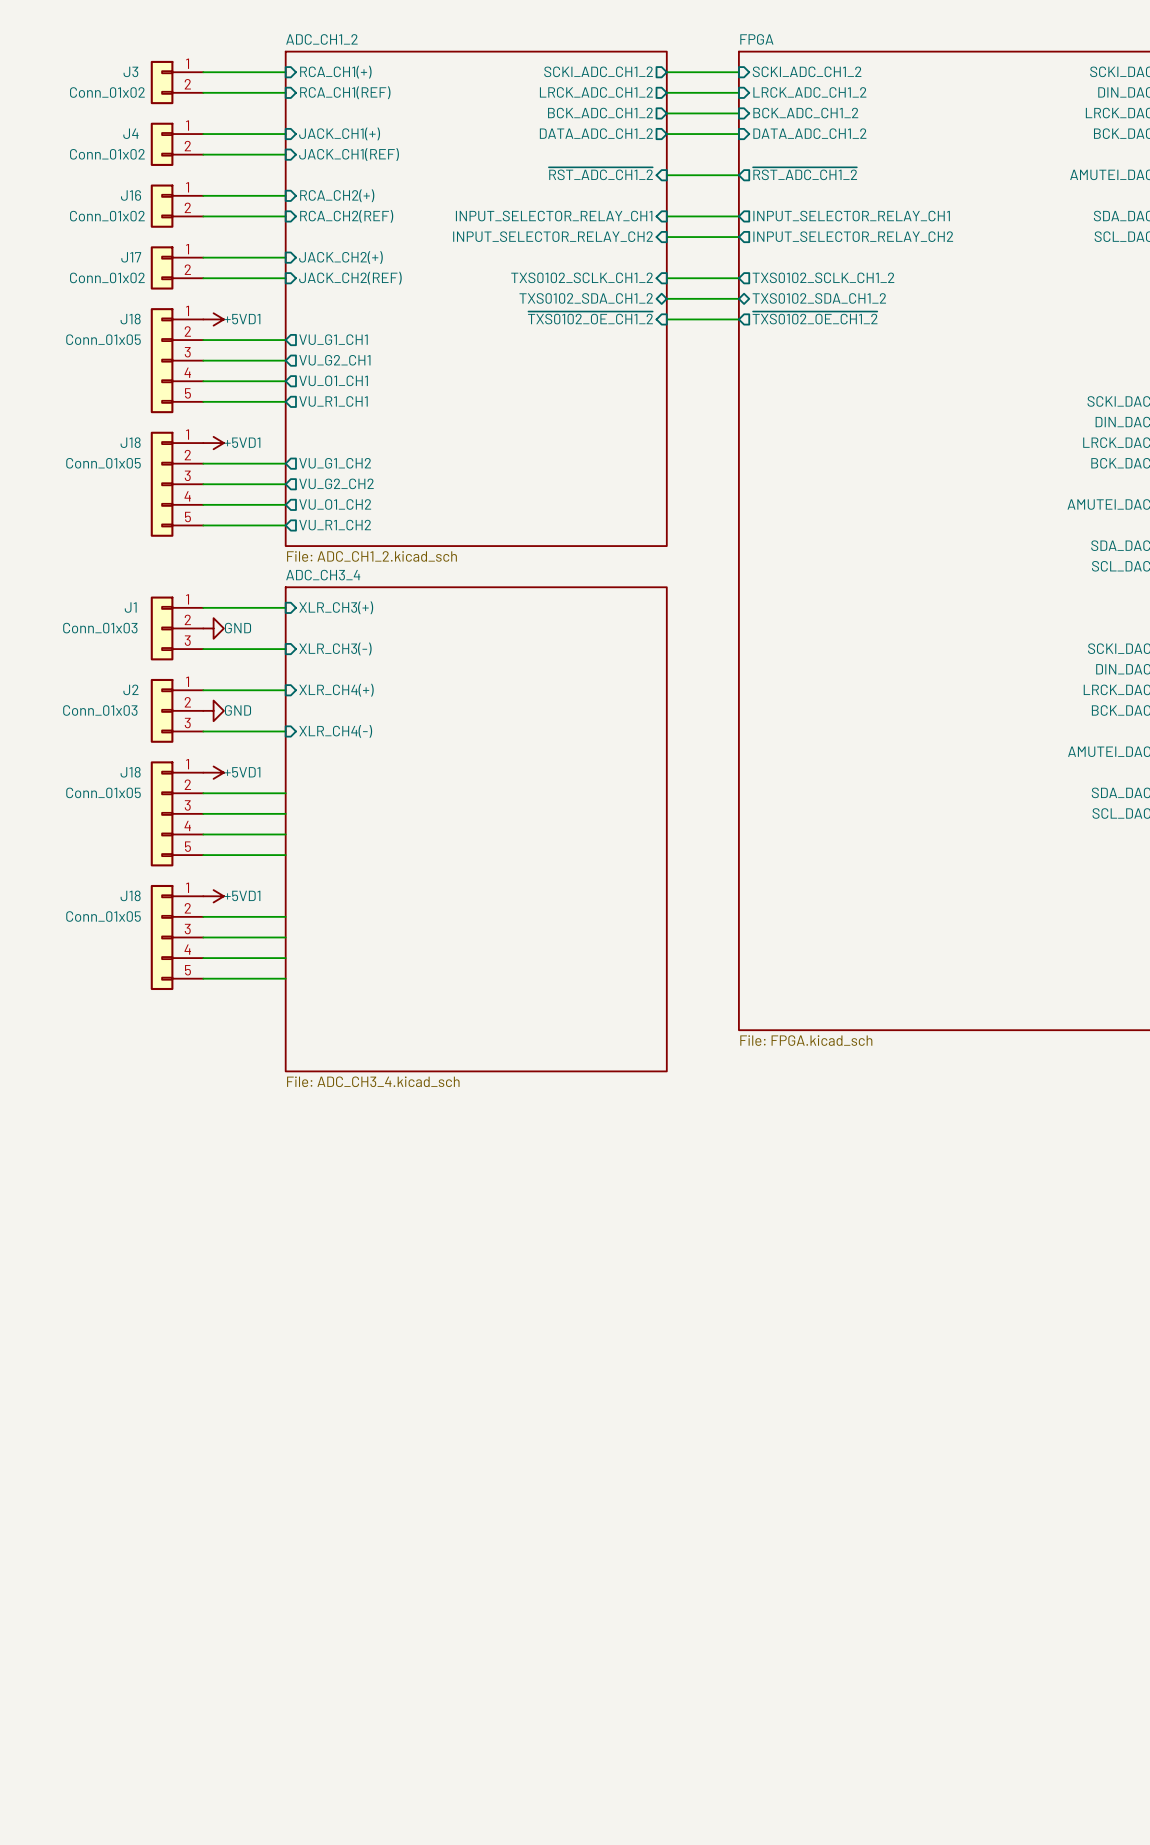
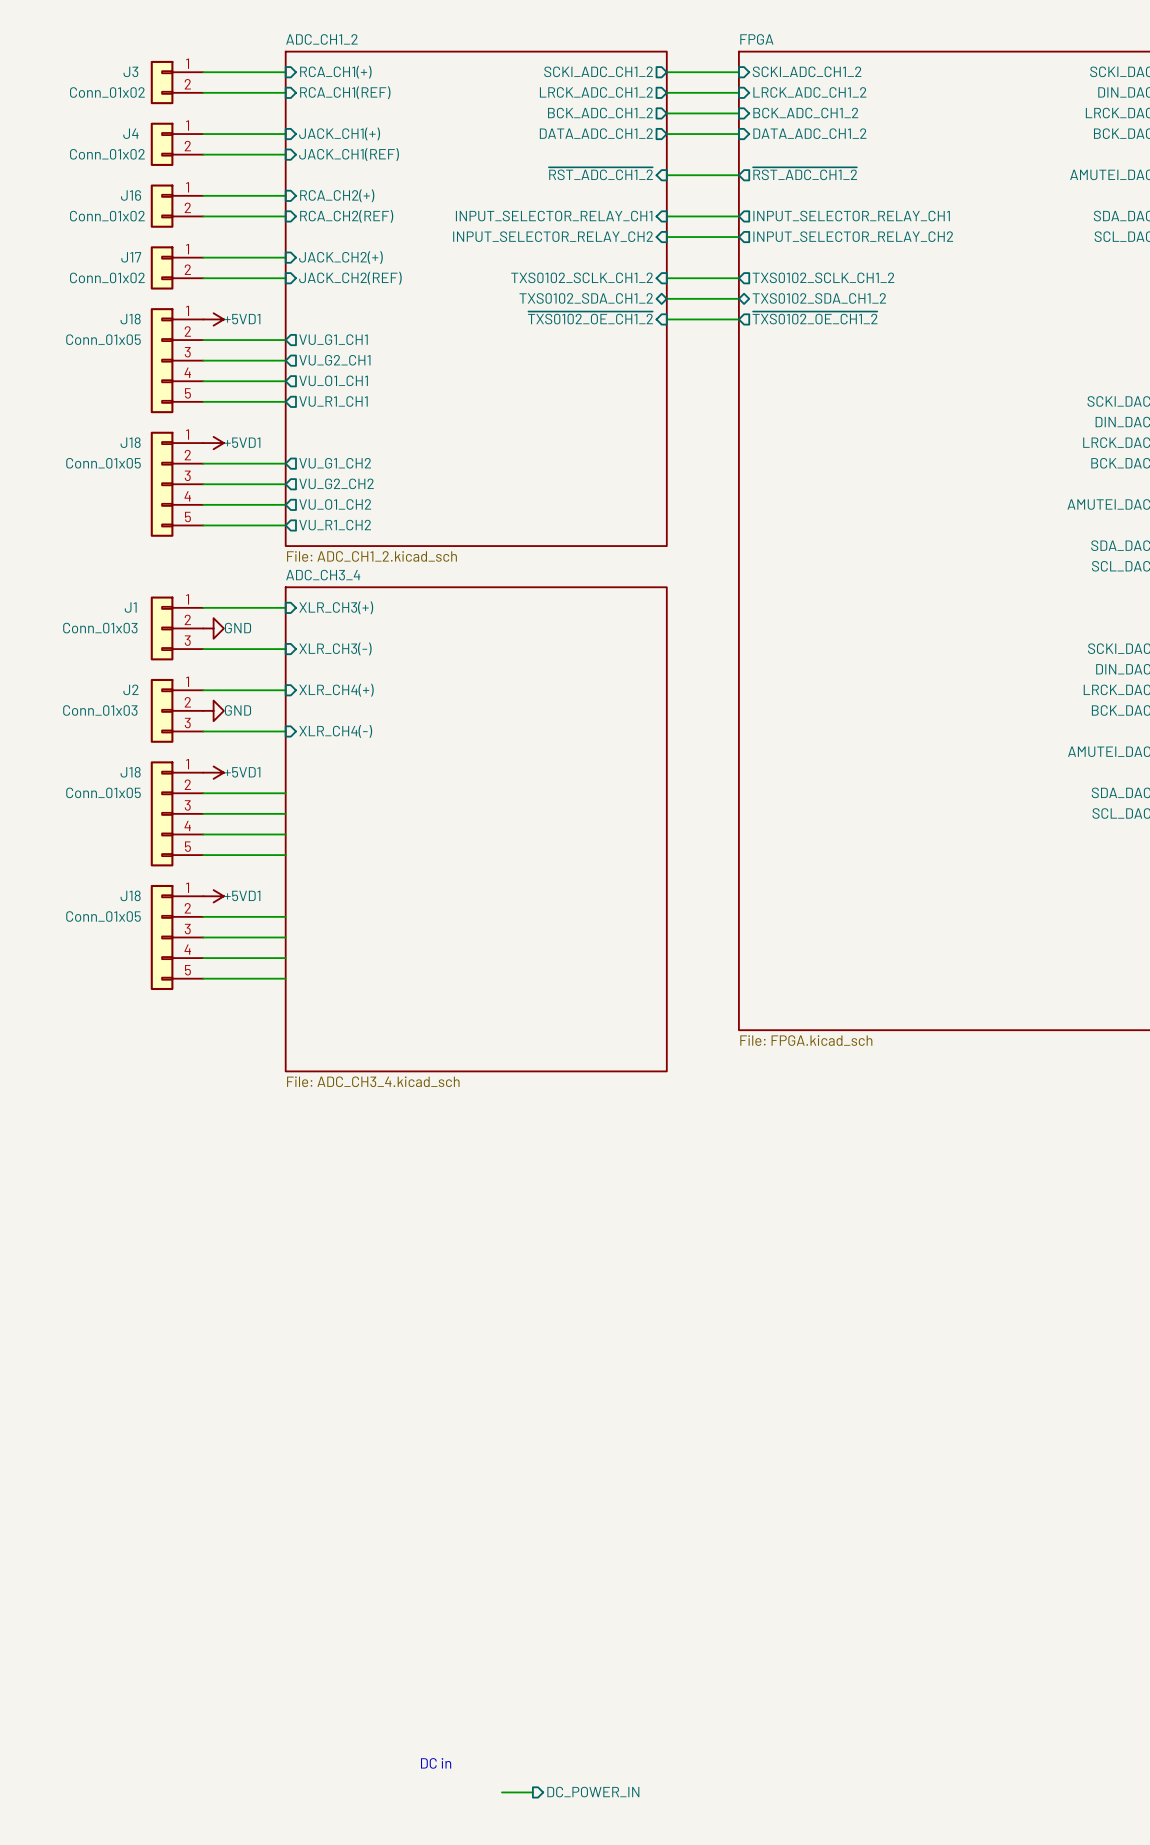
text: none -> DC in (436, 1763)
wire: none -> (502, 1792) (532, 1792)
sheet pin: none -> DC_POWER_IN (593, 1792)

